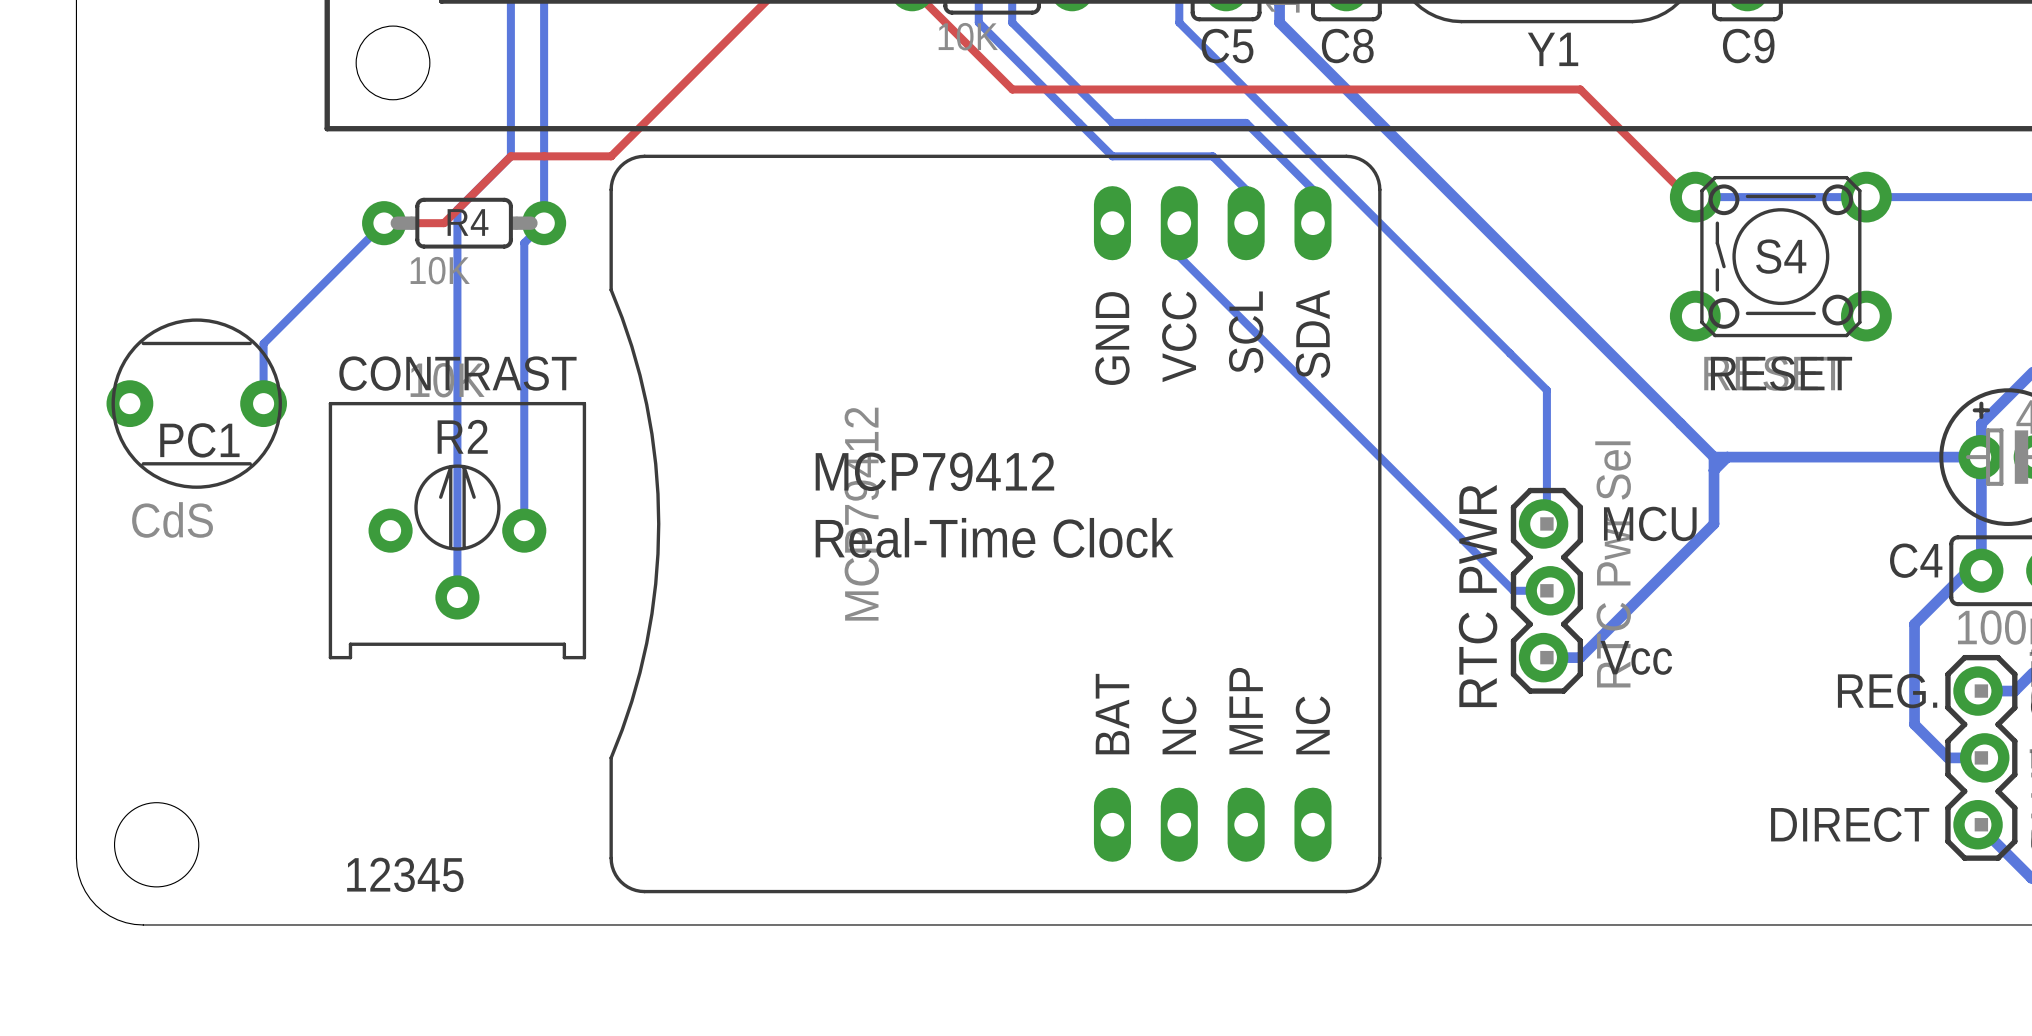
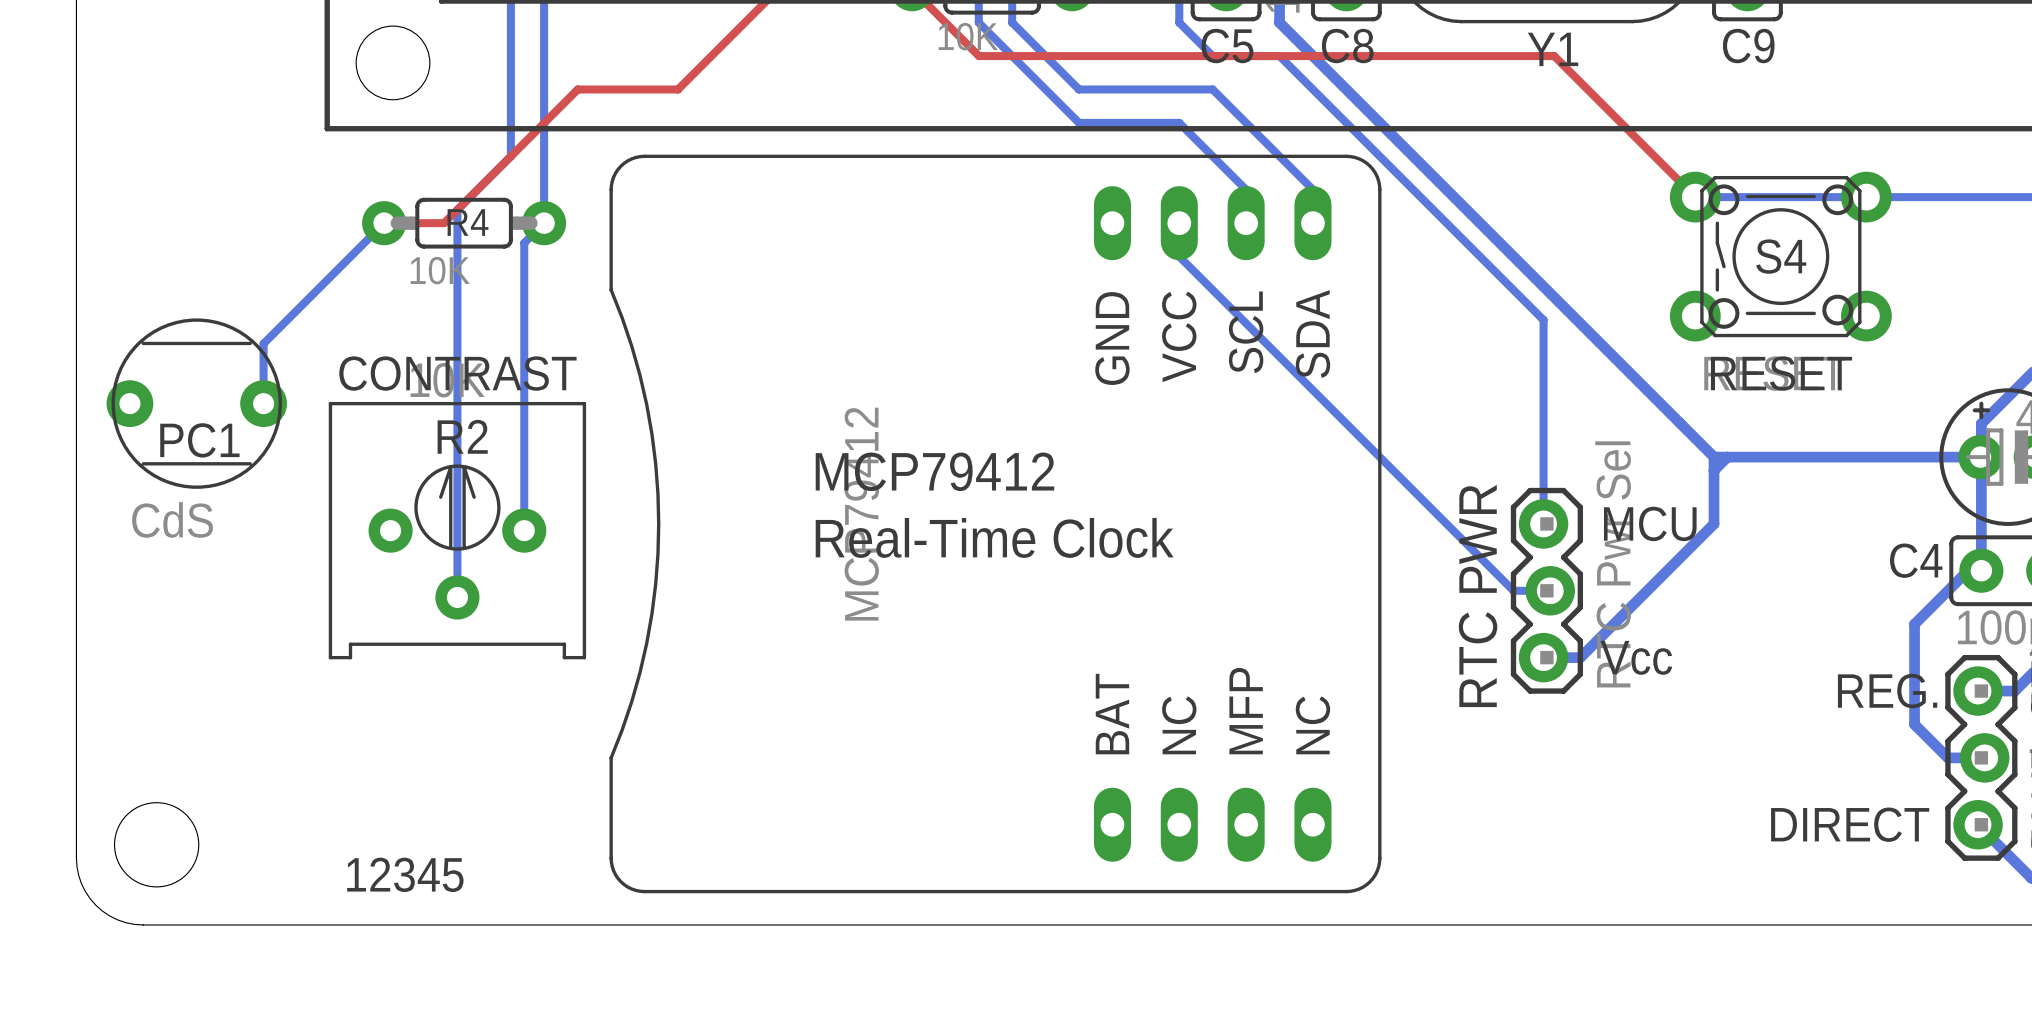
top track: (978, 56) (1012, 89) (1580, 89) (1687, 197) (1695, 197) -> (978, 56) (1554, 56) (1695, 197)
bottom track: (1212, 56) (1546, 390) (1546, 523) (1543, 523) -> (1212, 56) (1279, 56) (1543, 320) (1543, 523)
top track: (678, 89) (611, 156) (510, 156) -> (678, 89) (577, 89) (510, 156)
bottom track: (1079, 89) (1112, 122) -> (1079, 122) (1112, 122)
bottom track: none -> (1079, 89) (1212, 89) (1246, 122)
bottom track: (1079, 122) (1112, 156) (1212, 156) -> none
bottom track: (1179, 122) (1246, 122) -> (1179, 122) (1212, 156)

